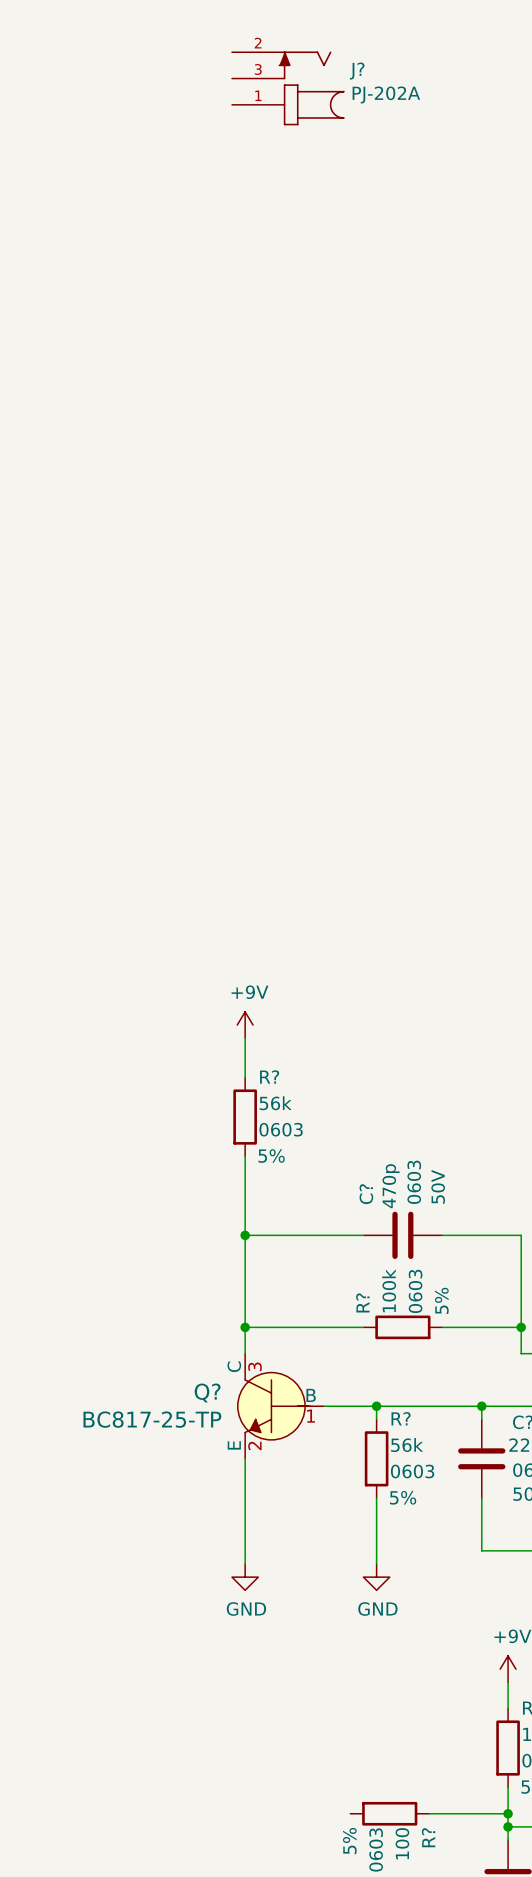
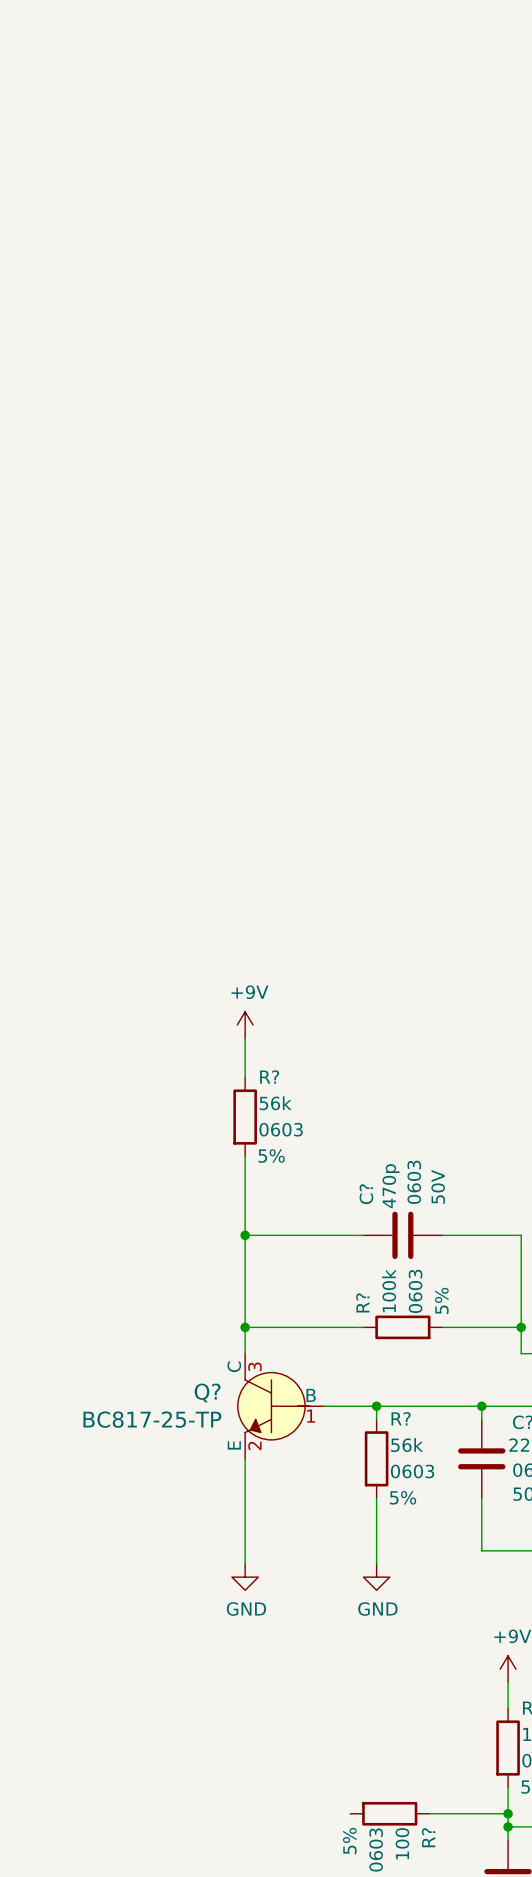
J?: PJ-202A (288, 88) -> none

